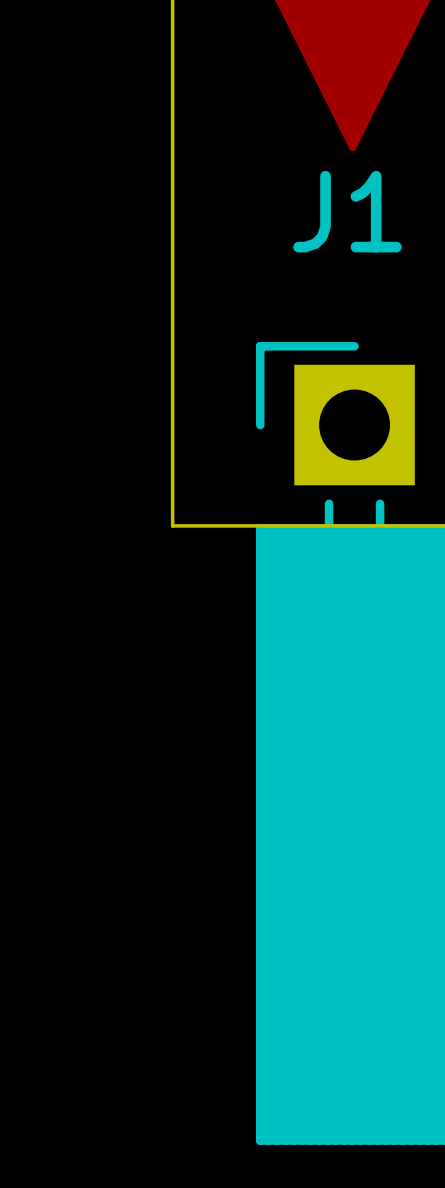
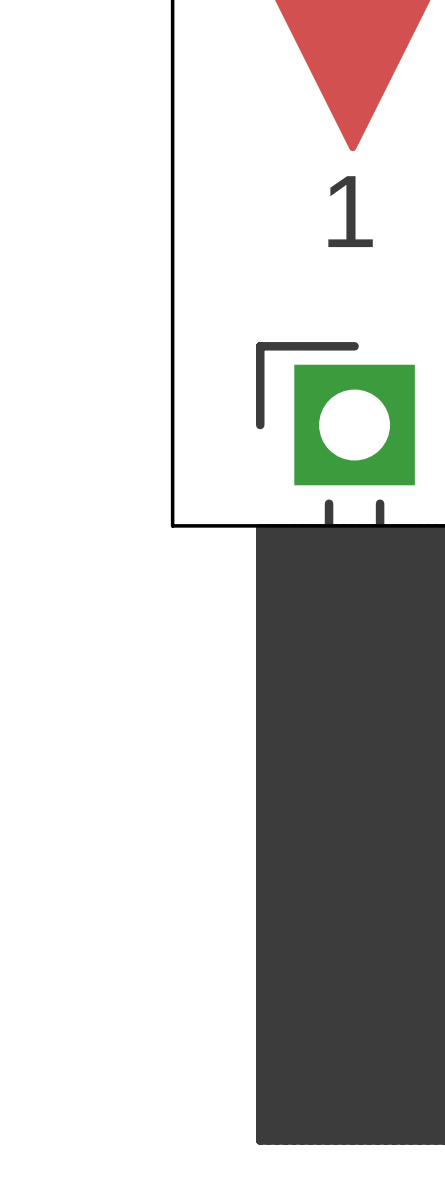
J1 name: J1 (347, 211) -> 1 (350, 211)

